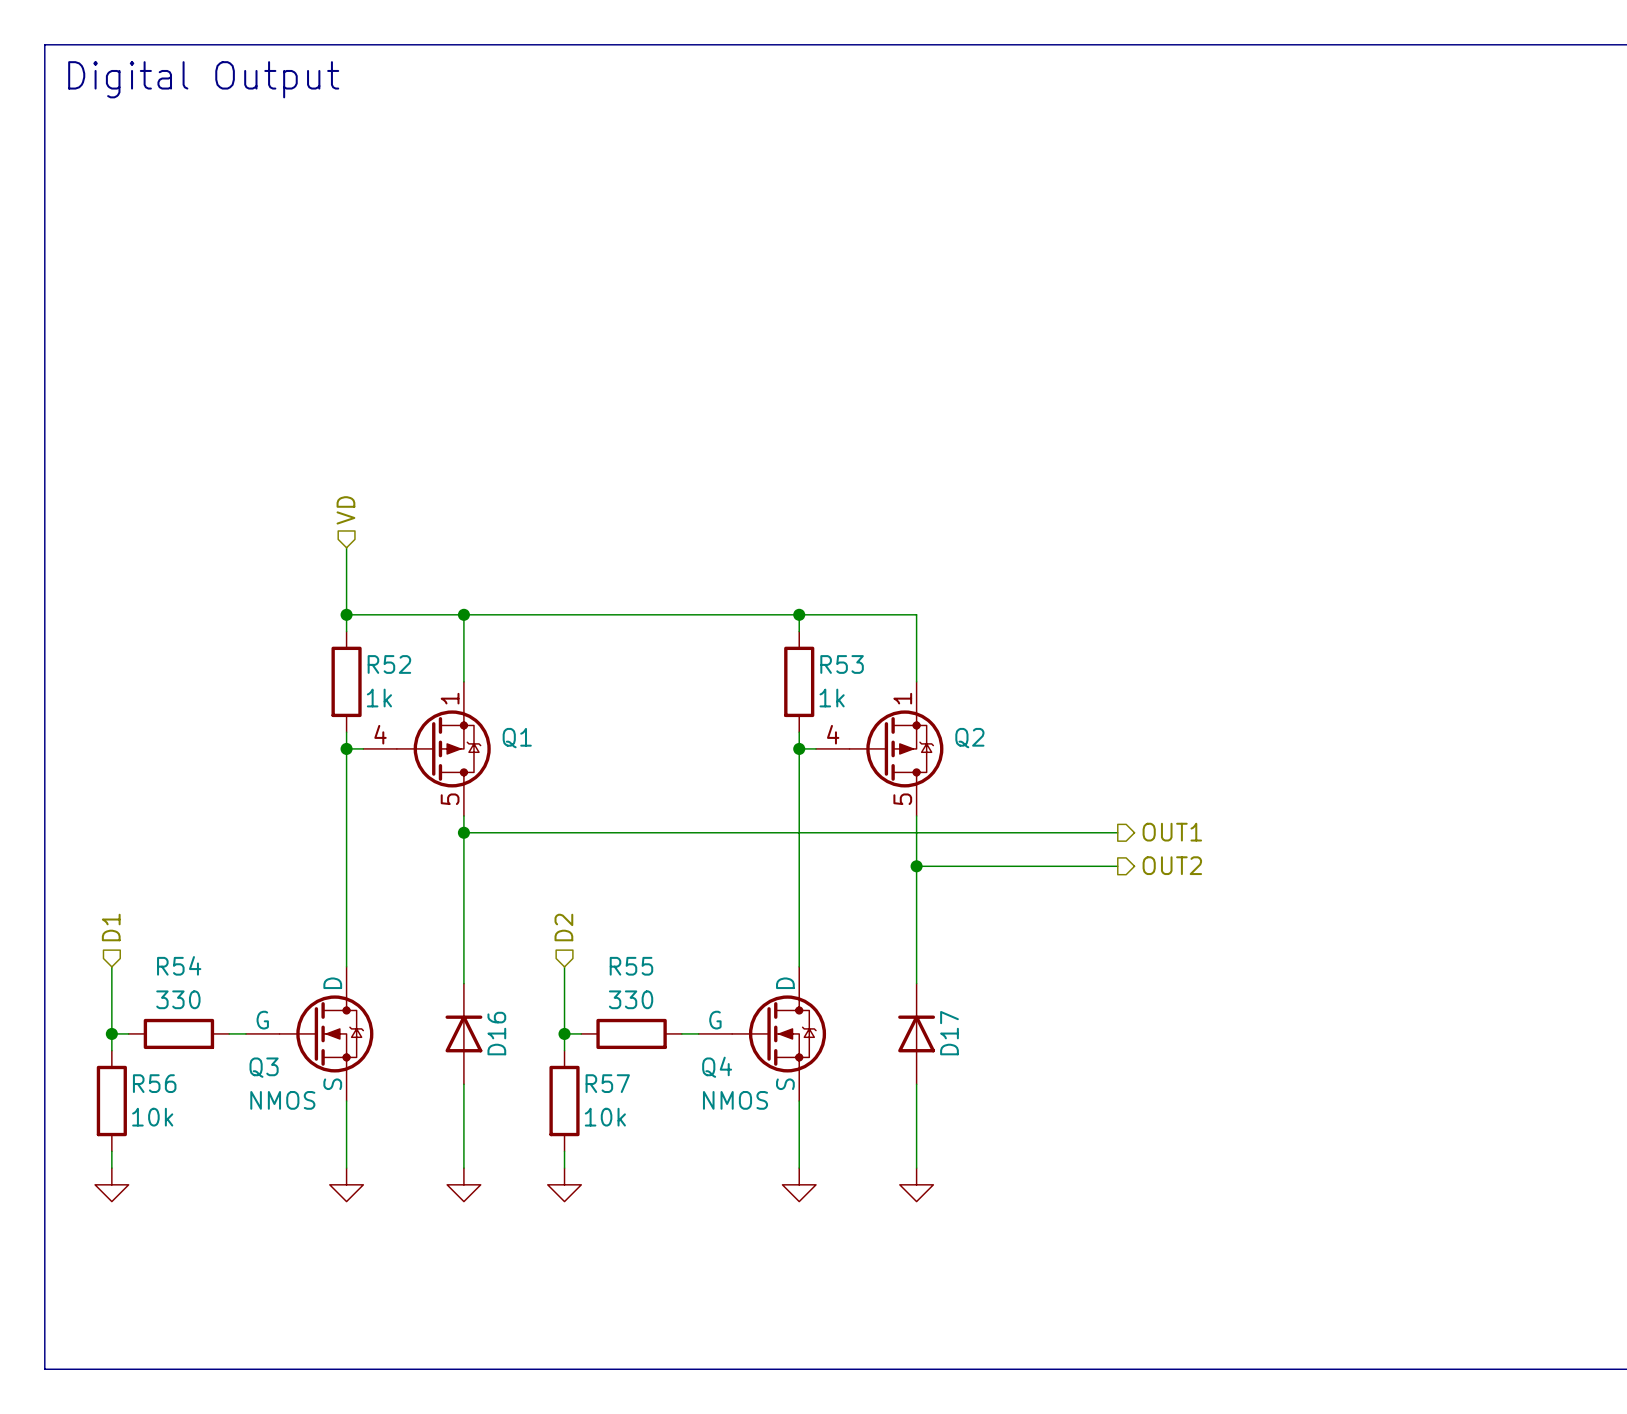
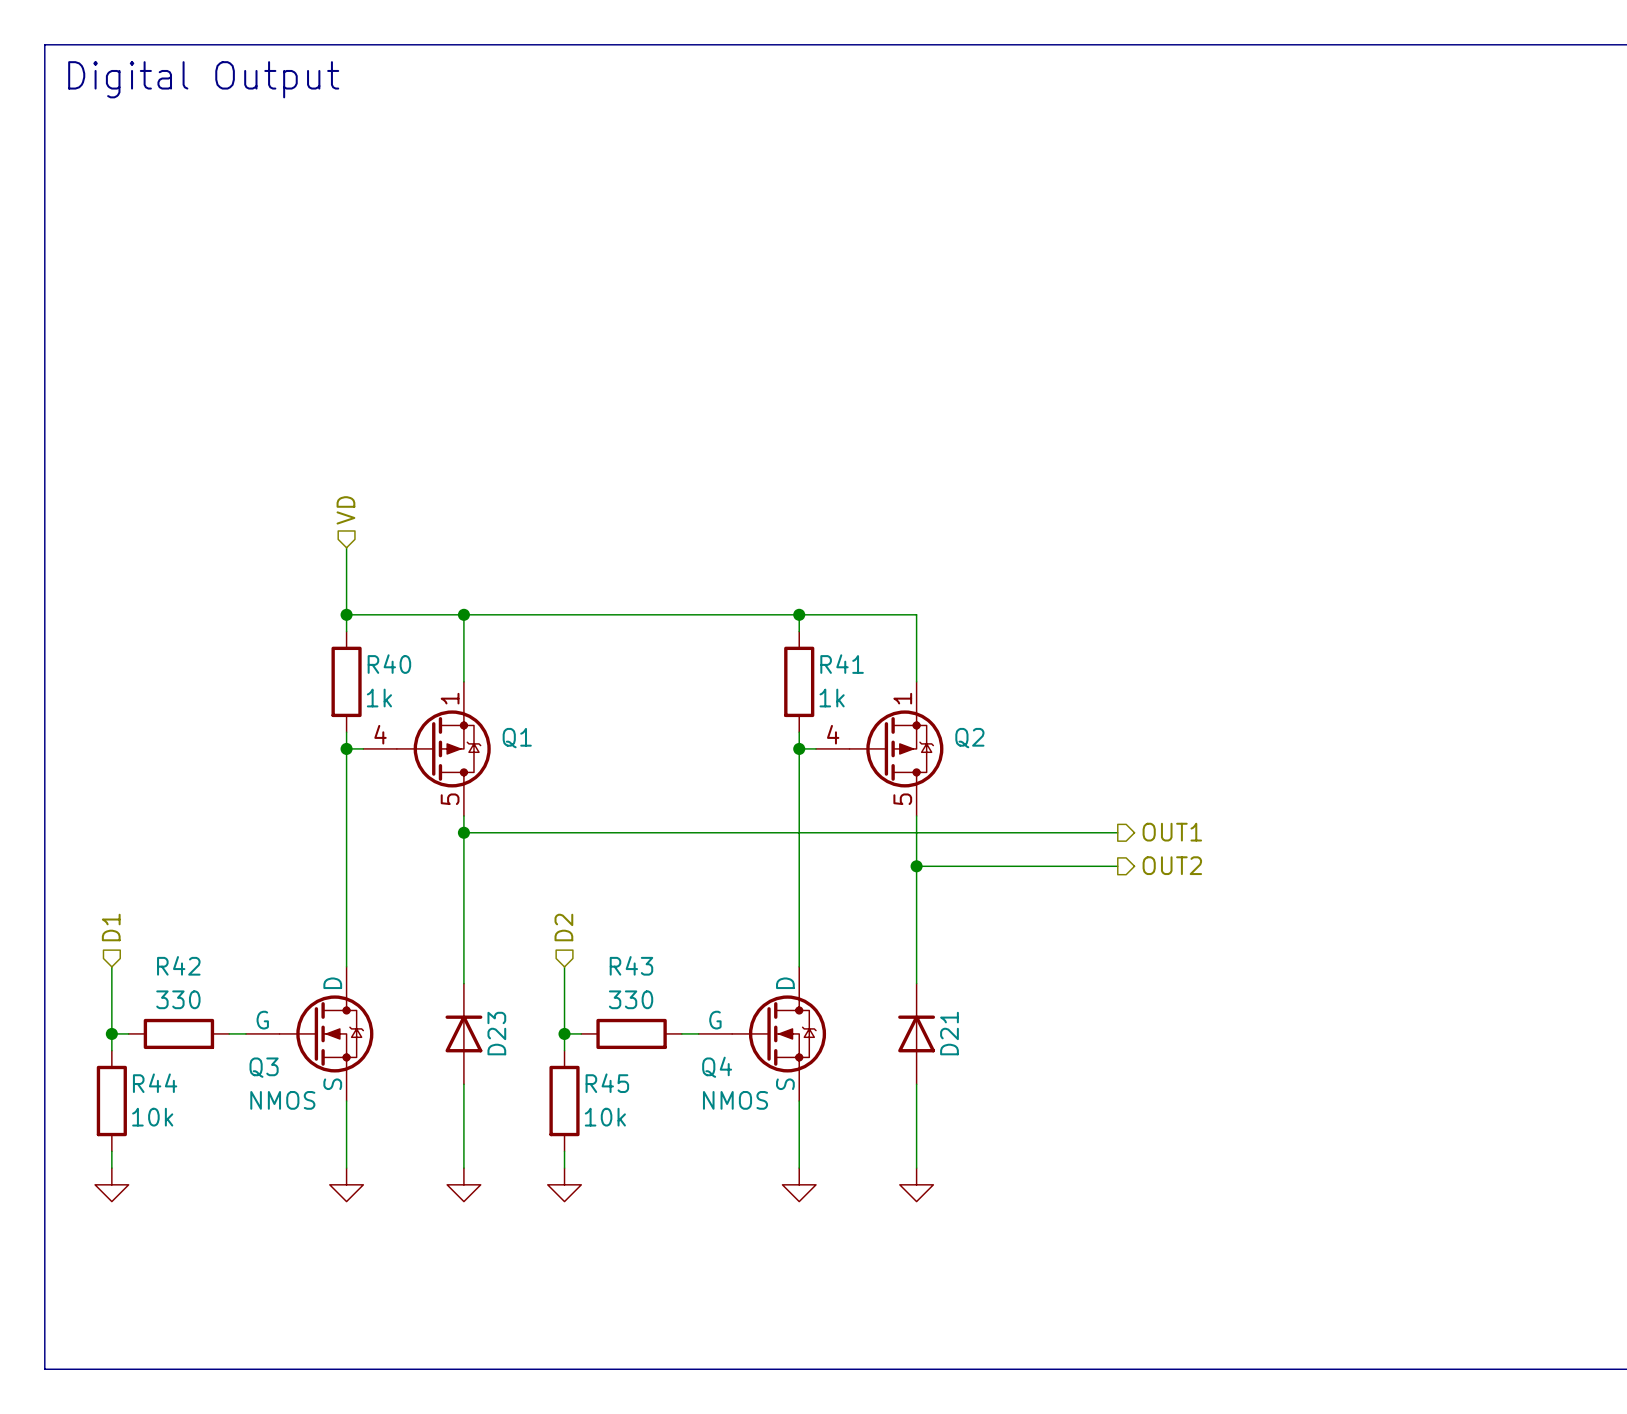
R52 name: R52 (389, 664) -> R40 (389, 664)
R53 name: R53 (842, 664) -> R41 (842, 664)
R54 name: R54 (179, 965) -> R42 (178, 965)
R55 name: R55 (631, 966) -> R43 (631, 965)
D16 name: D16 (496, 1033) -> D23 (496, 1033)
D17 name: D17 (949, 1033) -> D21 (949, 1033)
R56 name: R56 (154, 1083) -> R44 (155, 1083)
R57 name: R57 (607, 1083) -> R45 (607, 1083)

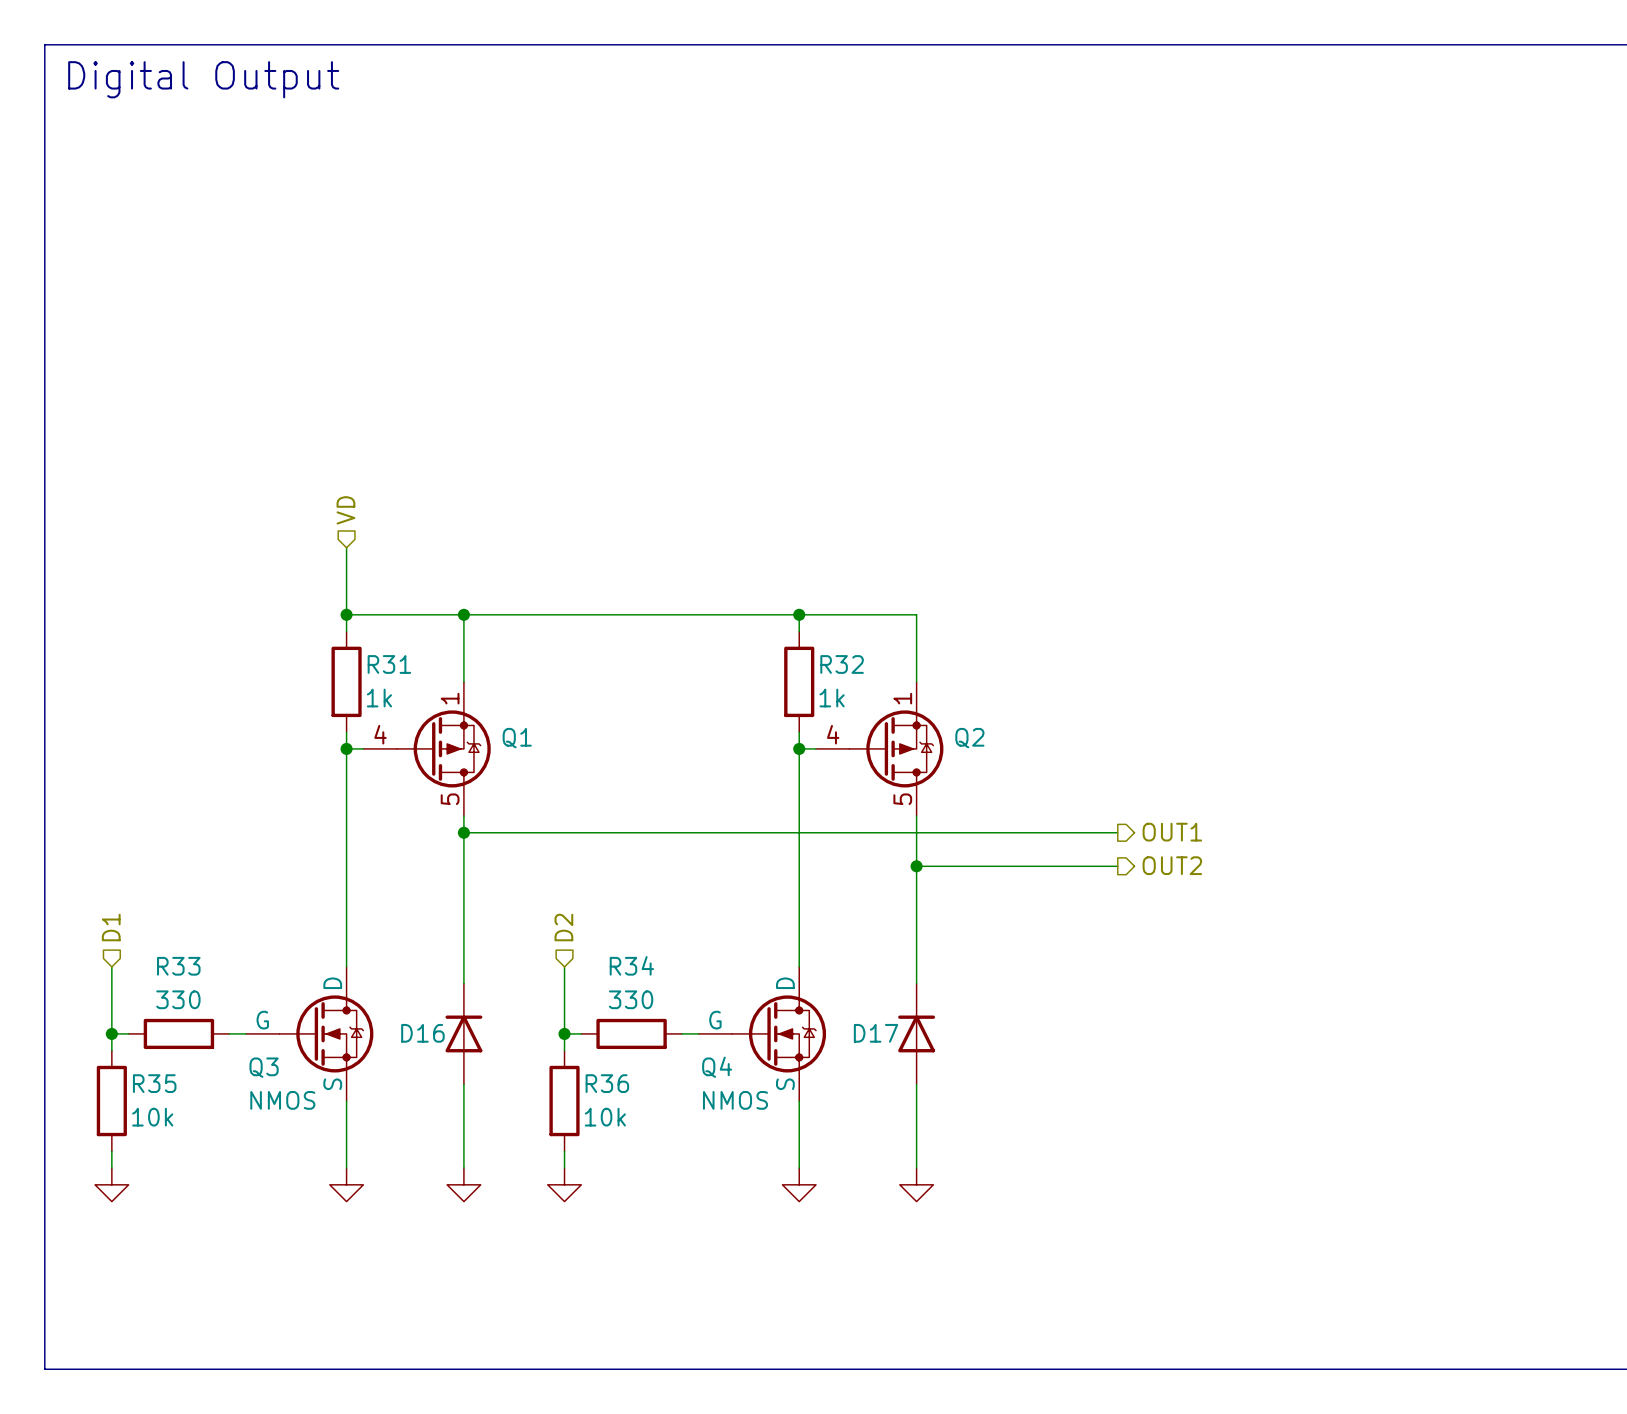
R40 name: R40 (389, 664) -> R31 (389, 664)
R41 name: R41 (842, 664) -> R32 (842, 664)
R42 name: R42 (178, 965) -> R33 (178, 966)
R43 name: R43 (631, 965) -> R34 (631, 965)
D23 name: D23 (496, 1033) -> D16 (422, 1033)
D21 name: D21 (949, 1033) -> D17 (876, 1033)
R44 name: R44 (155, 1083) -> R35 (154, 1083)
R45 name: R45 (607, 1083) -> R36 (607, 1083)

